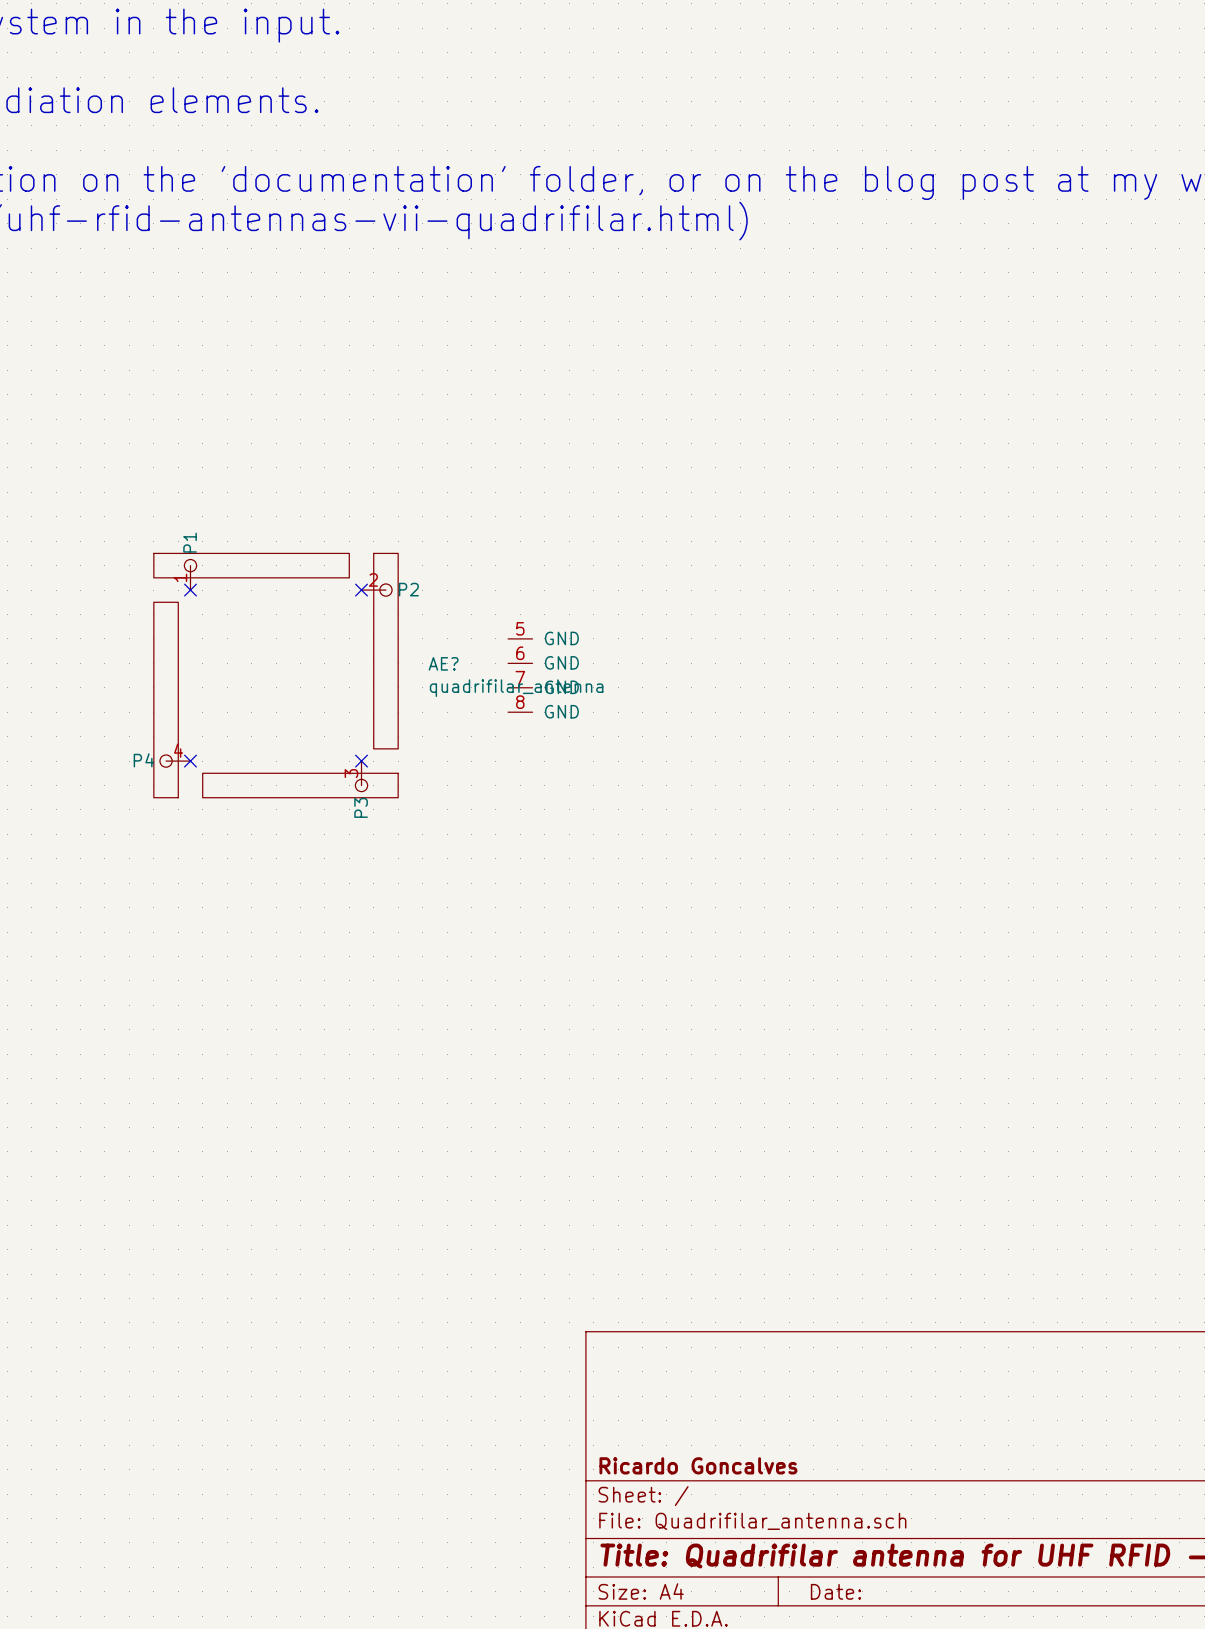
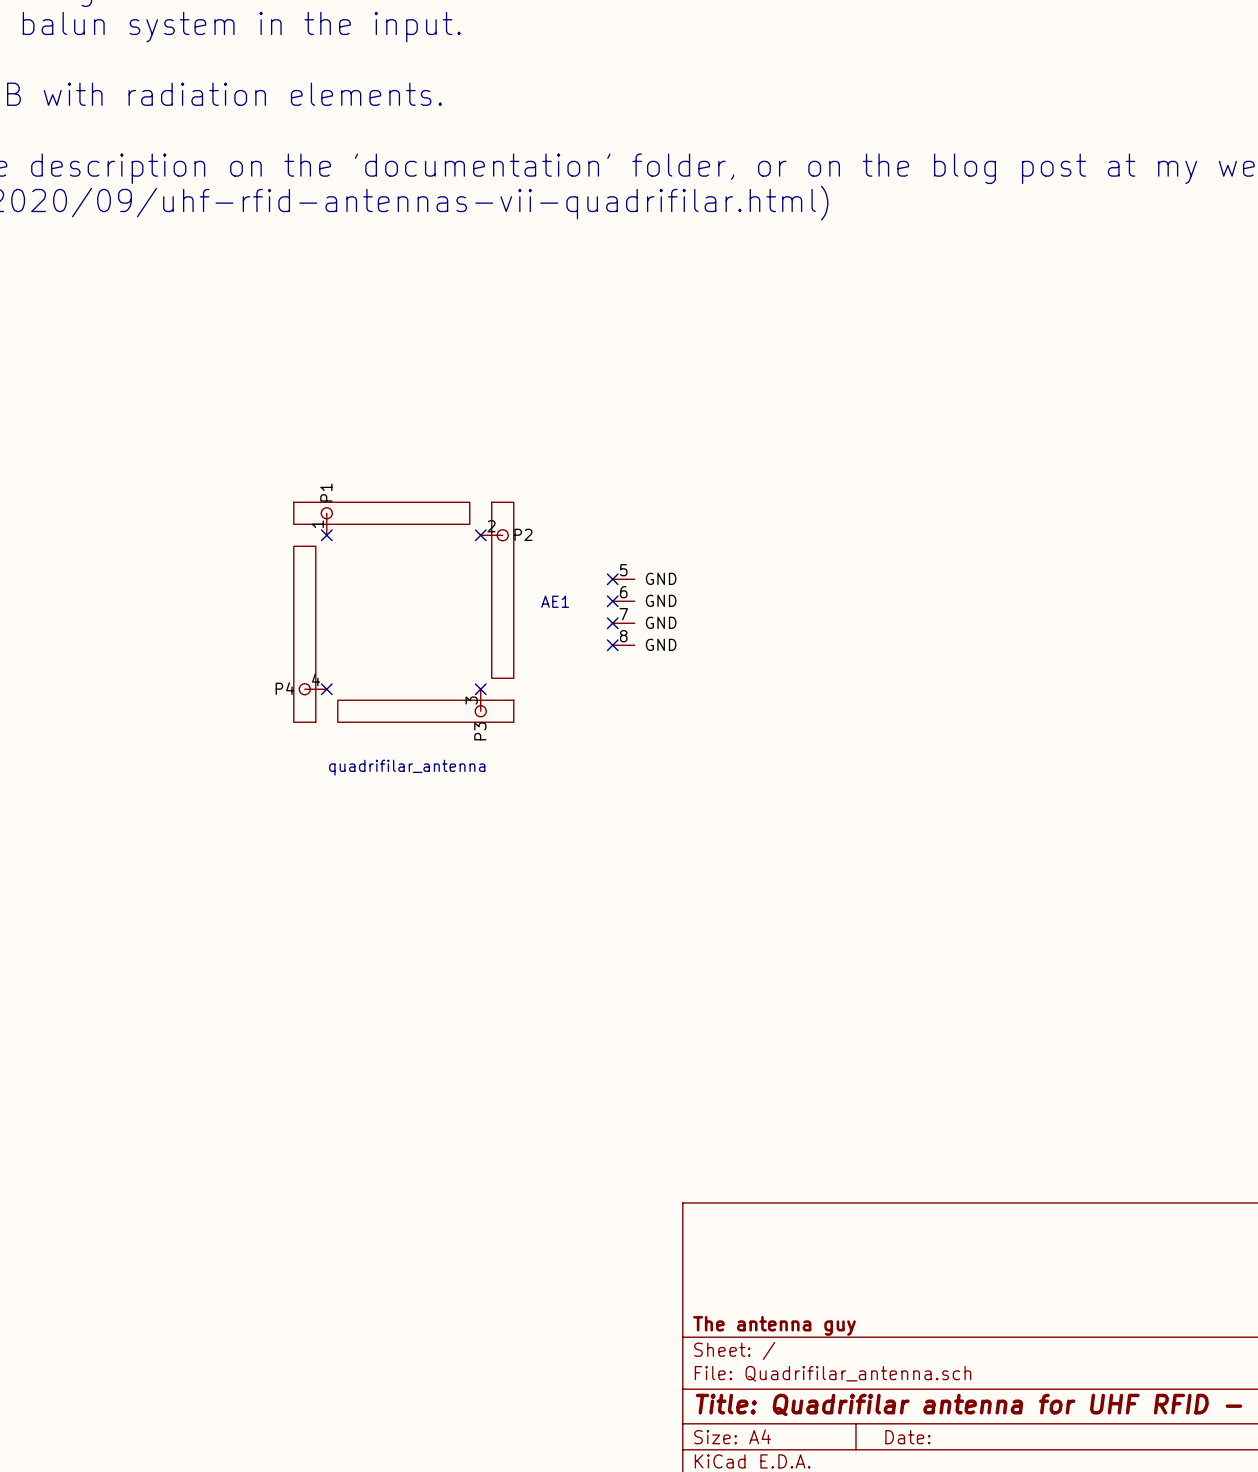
no-connect mark: none -> (612, 579)
AE? name: AE? (443, 663) -> AE1 (555, 601)
no-connect mark: none -> (612, 601)
no-connect mark: none -> (612, 623)
AE? value position: quadrifilar_antenna (516, 688) -> quadrifilar_antenna (407, 767)
no-connect mark: none -> (612, 645)
title block: Ricardo Goncalves (698, 1465) -> The antenna guy (774, 1325)

